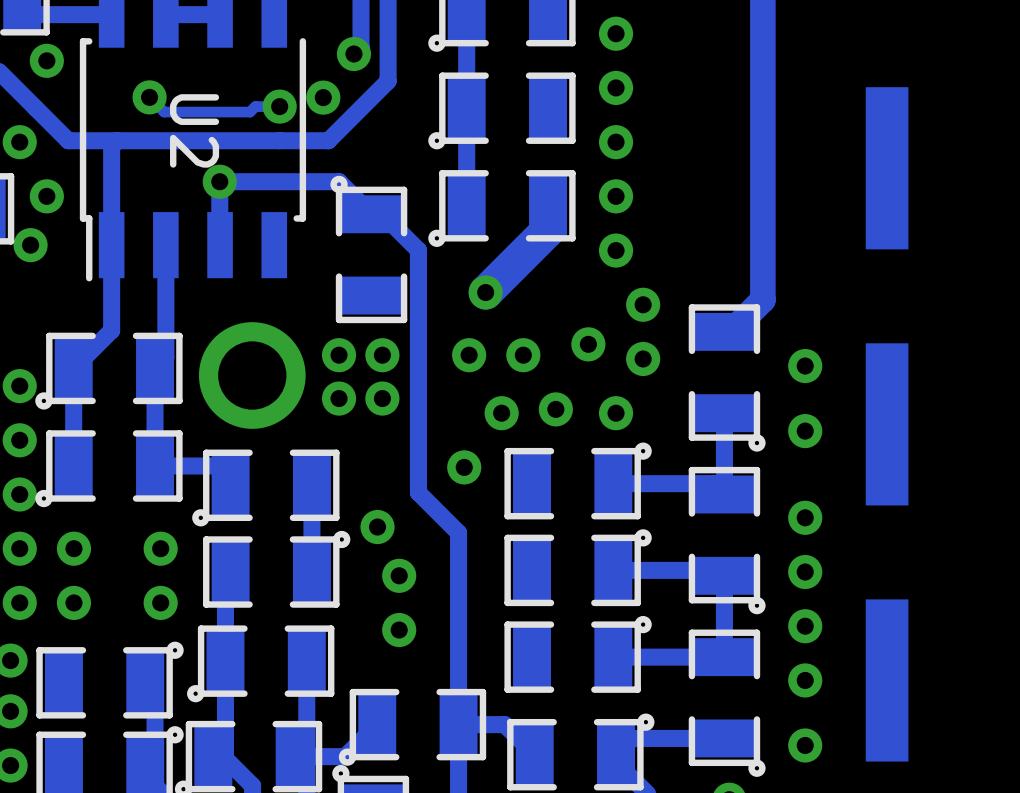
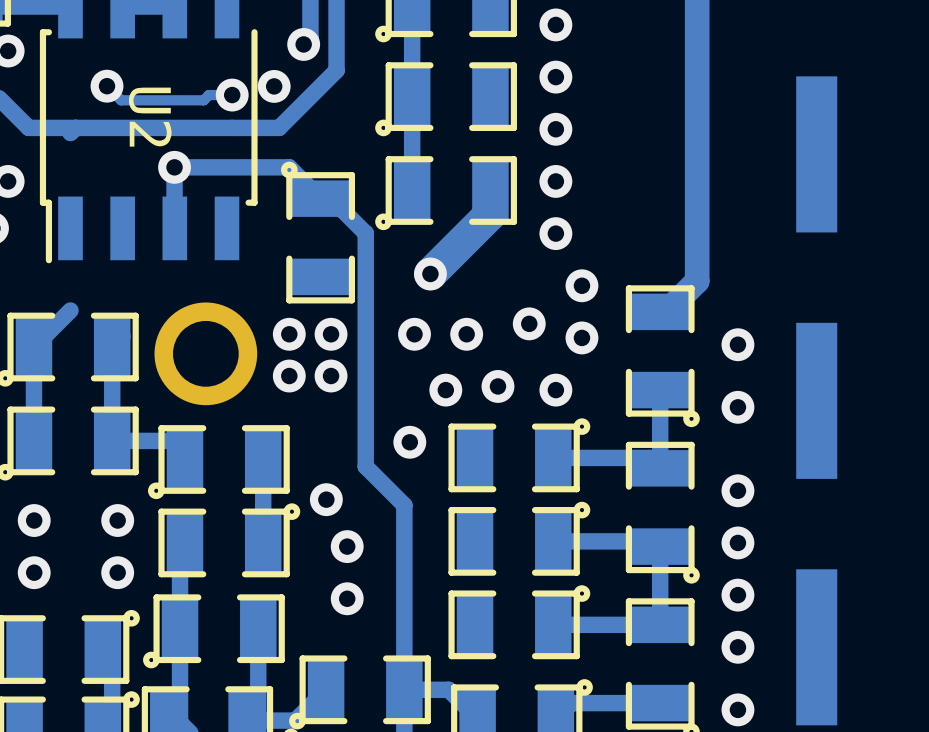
track: (111, 146) (111, 330) -> none
track: (165, 245) (165, 357) -> none

